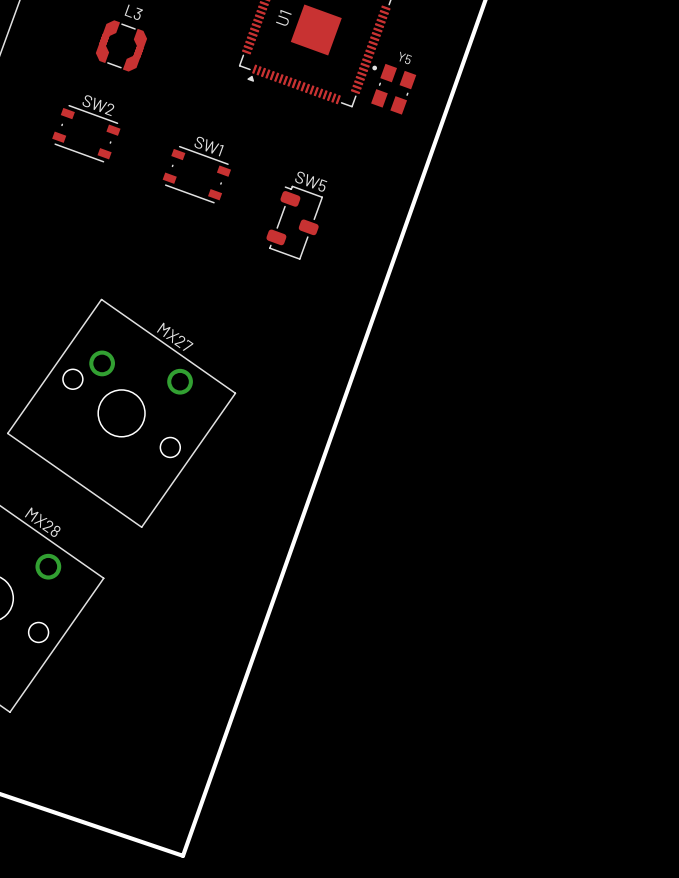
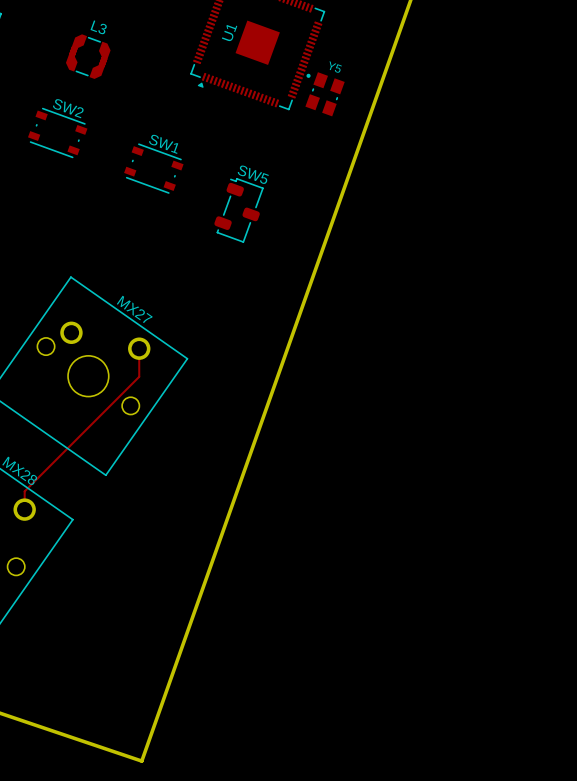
track: none -> (139, 348) (139, 376) (24, 491) (24, 509)

